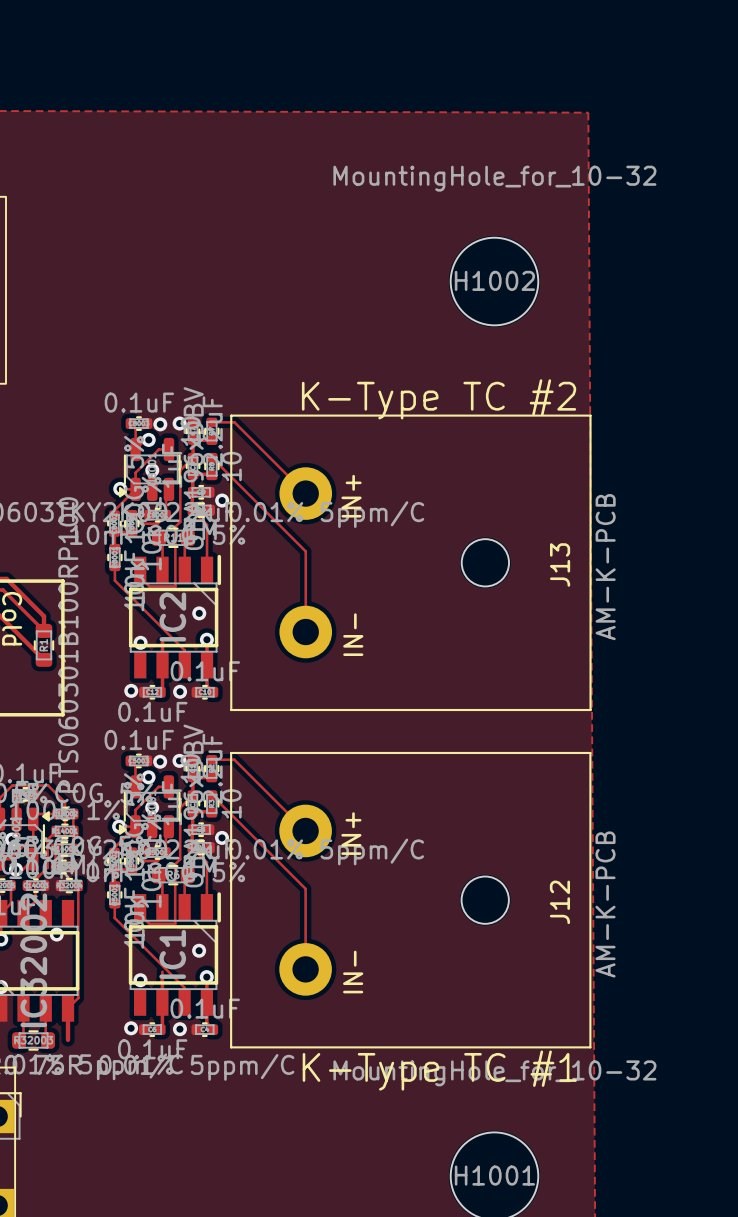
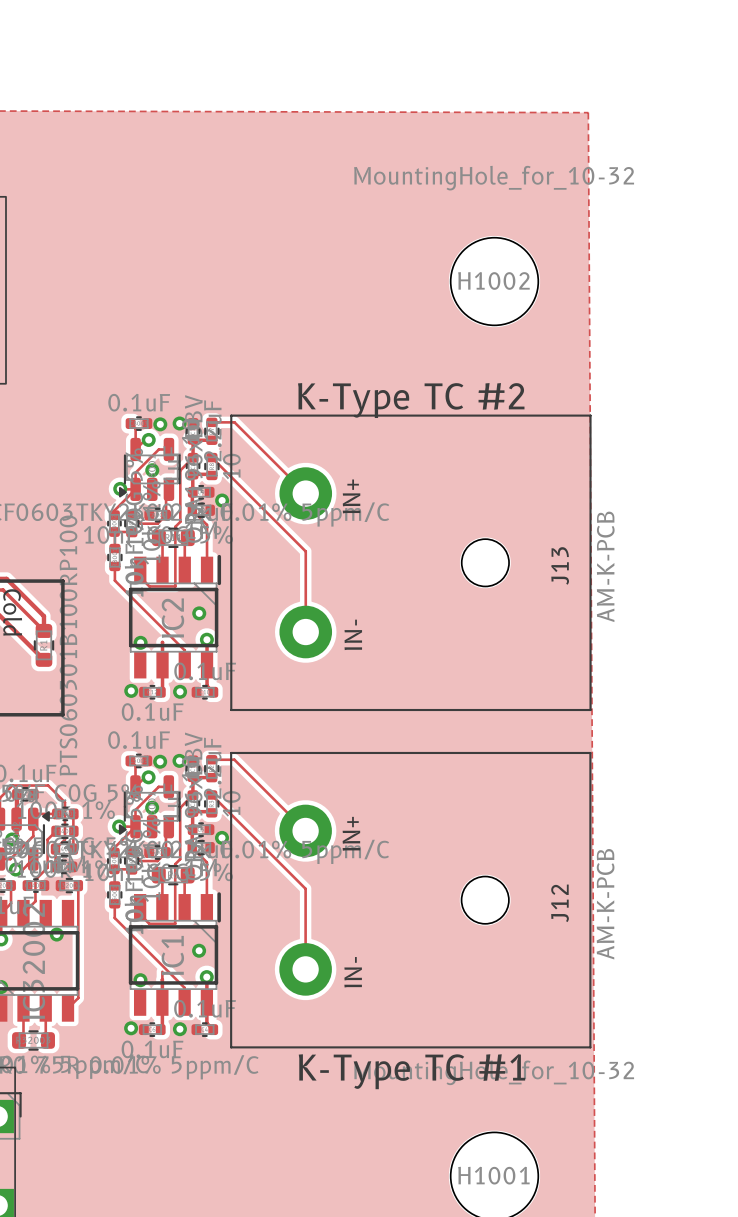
track: (68, 1008) (68, 1039) -> none

